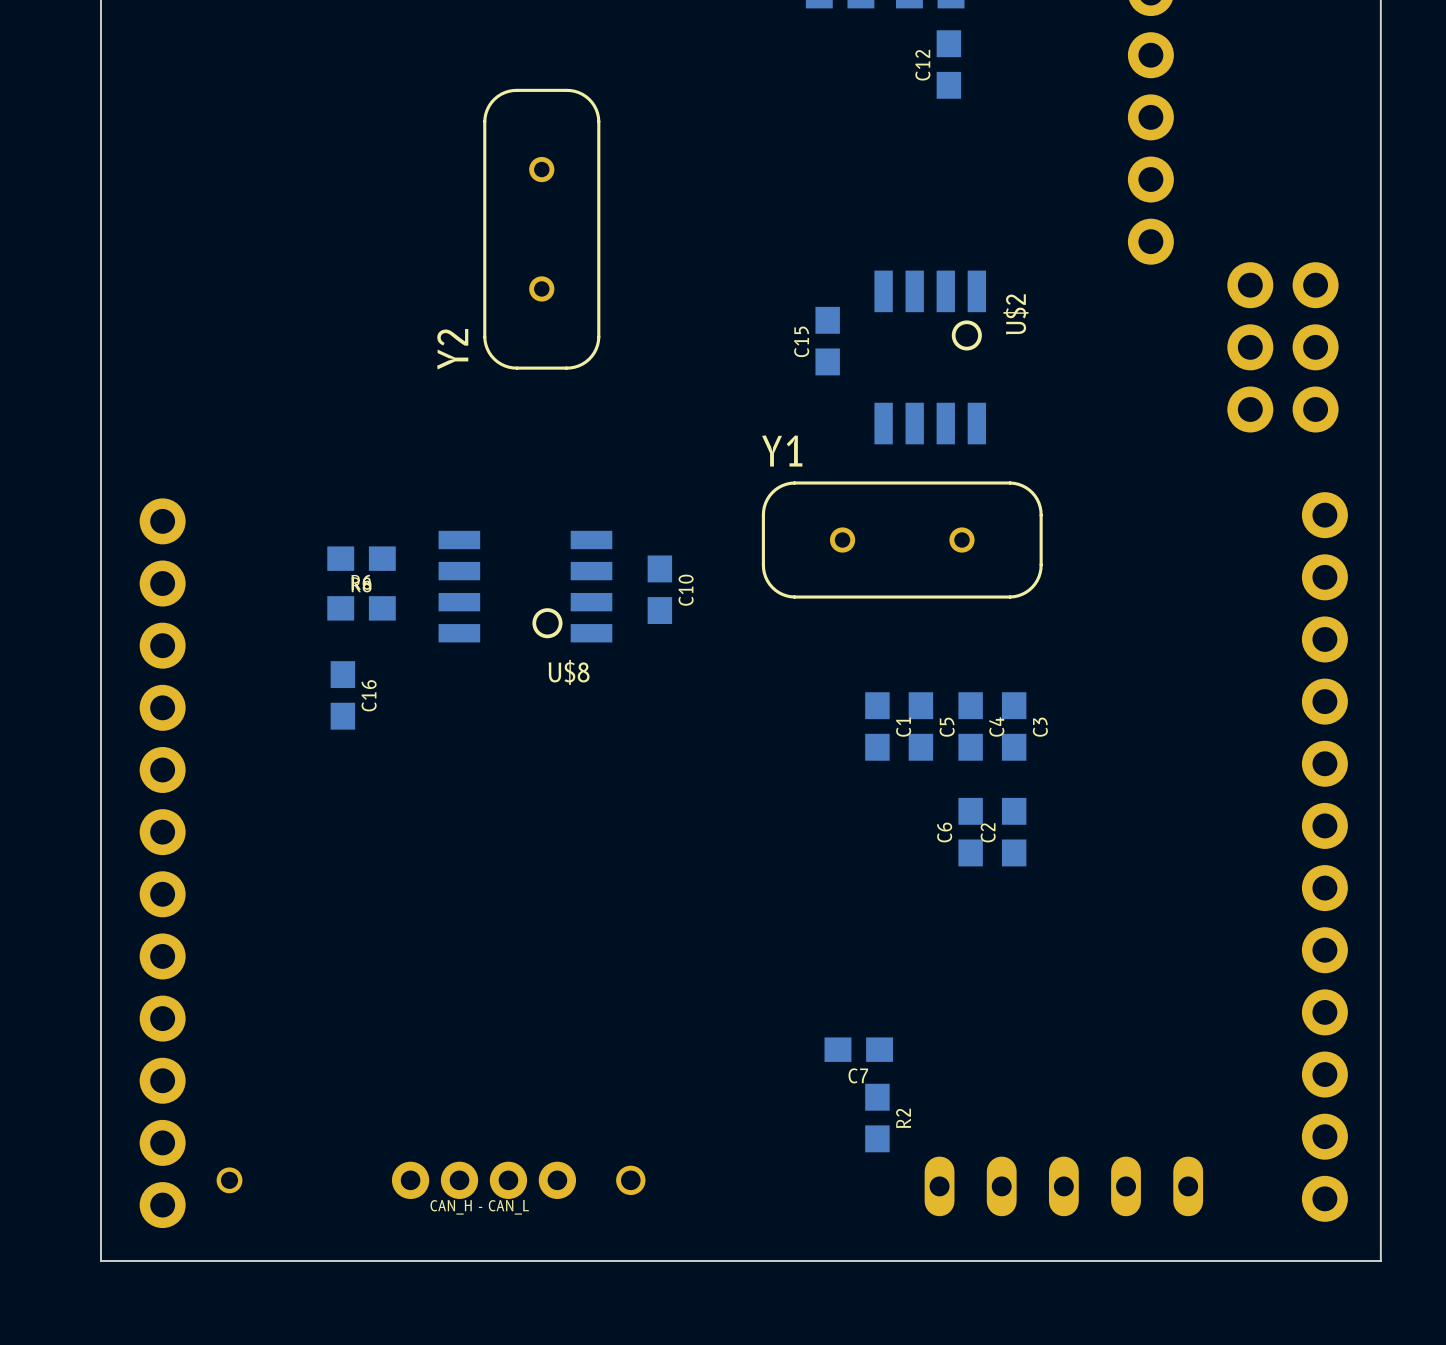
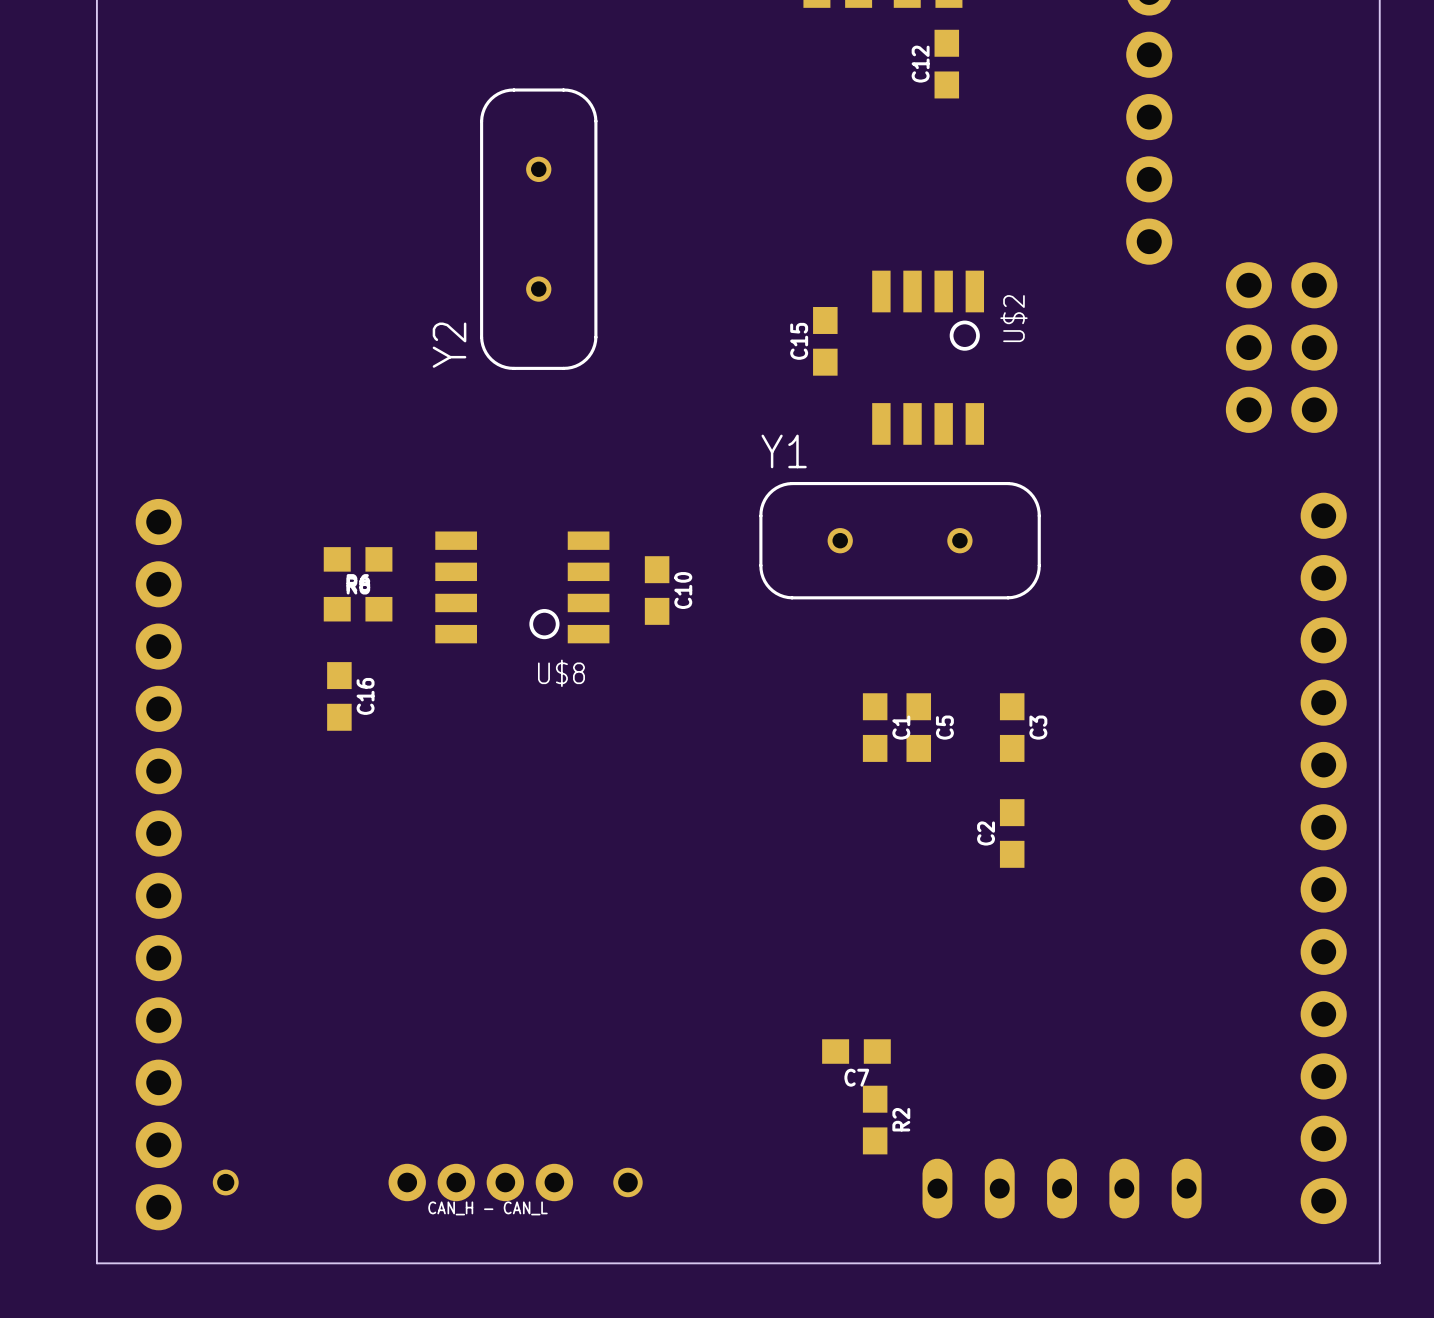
C4: (970, 726) -> none
C6: (970, 832) -> none

